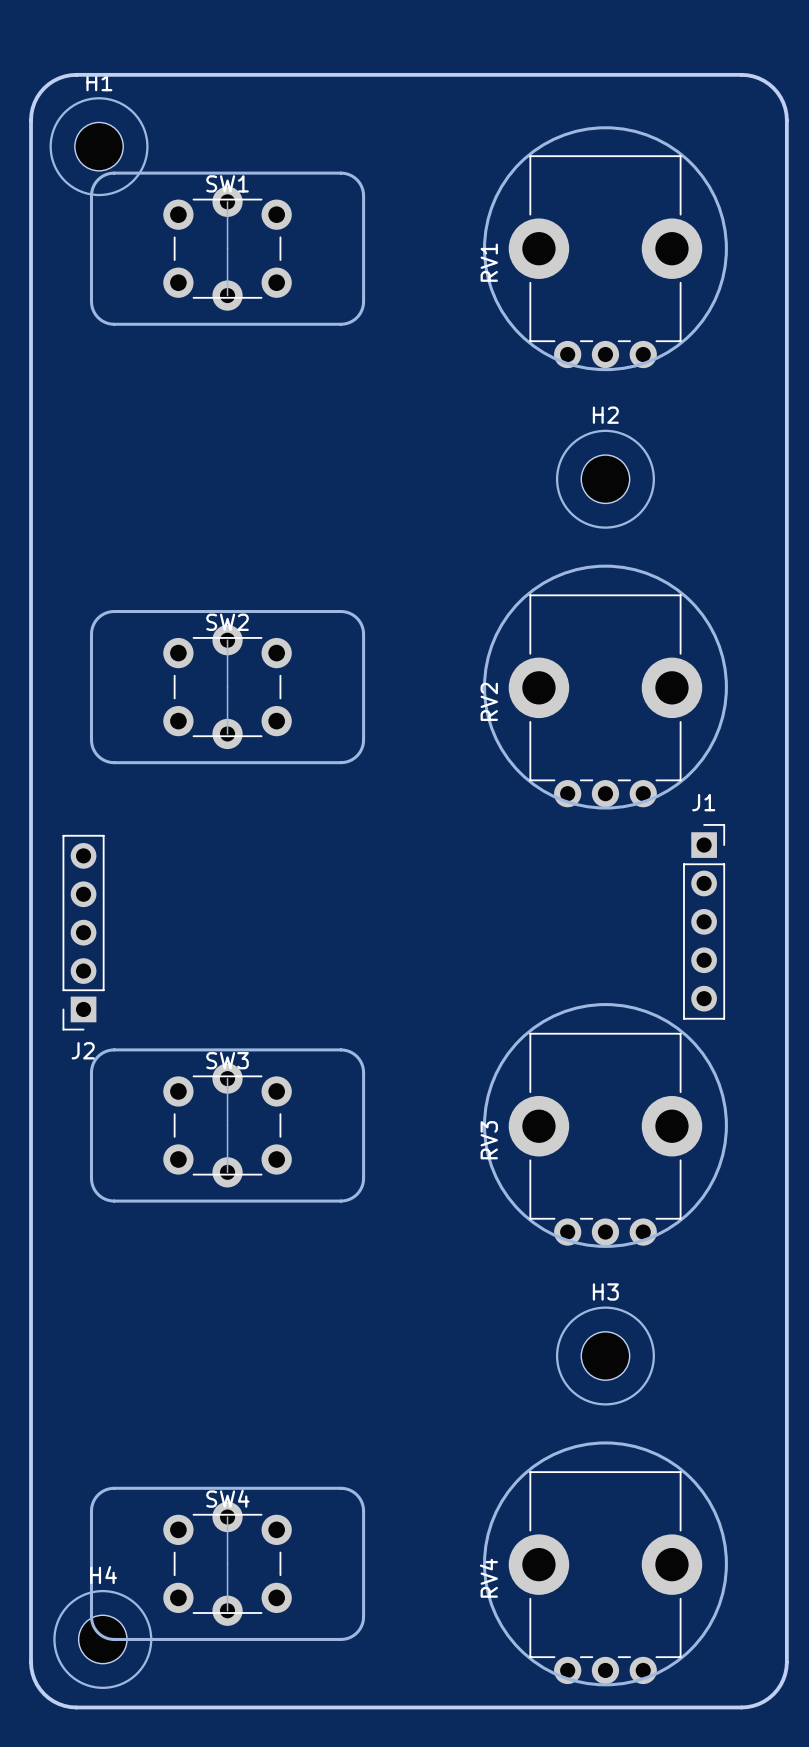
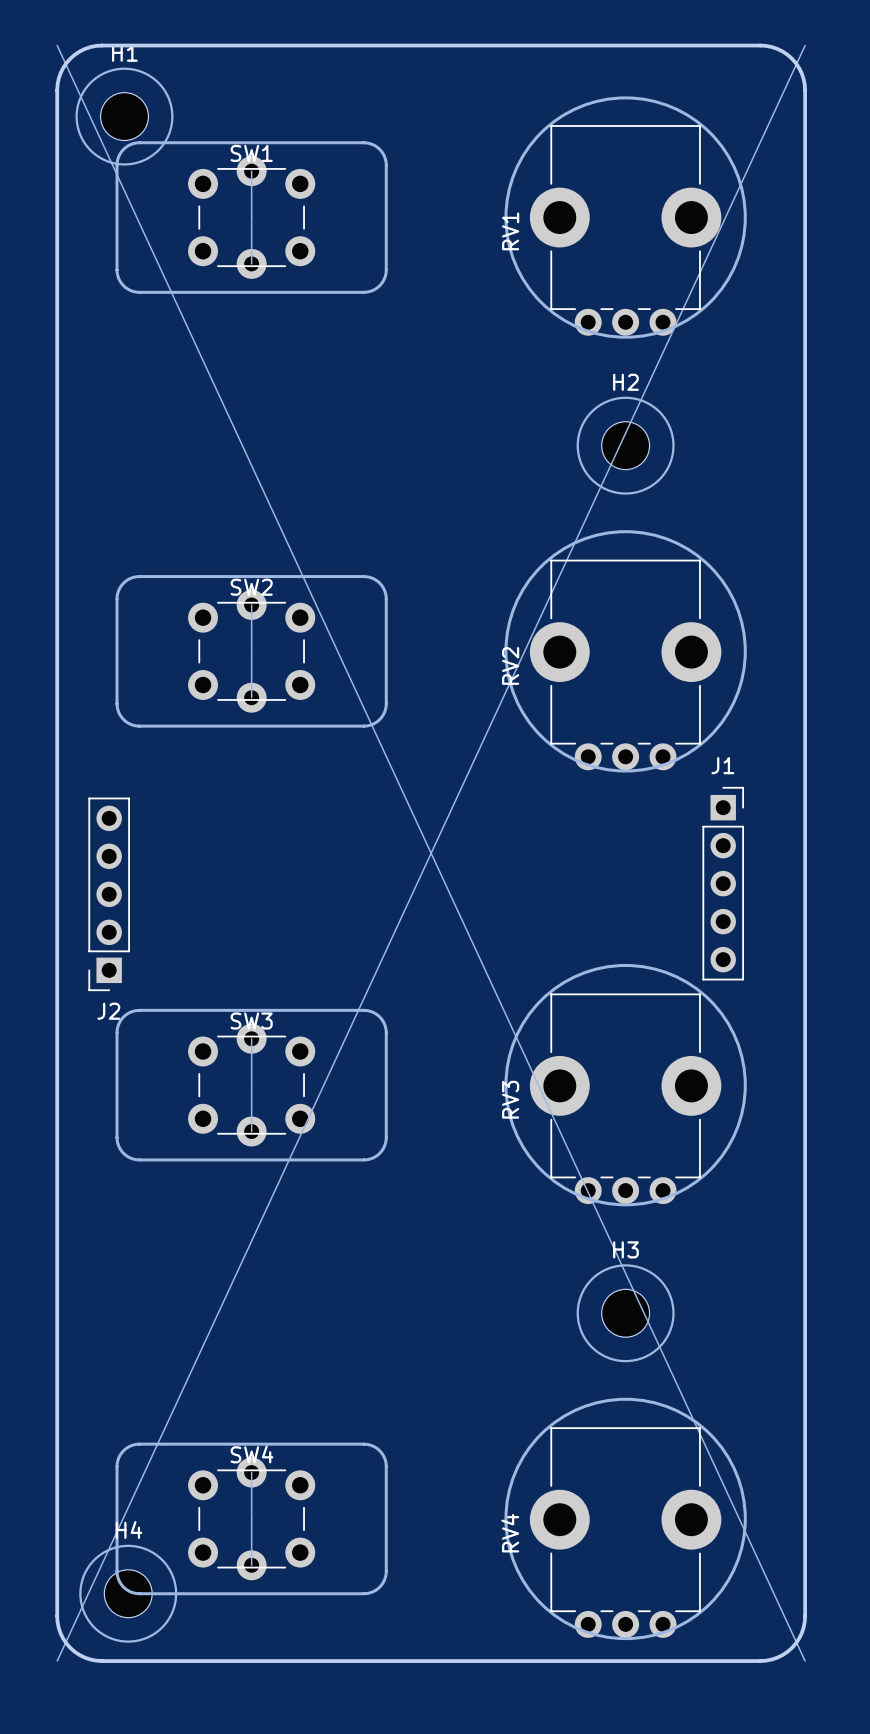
line: none -> (57, 45) (805, 1661)
line: none -> (805, 45) (57, 1661)

